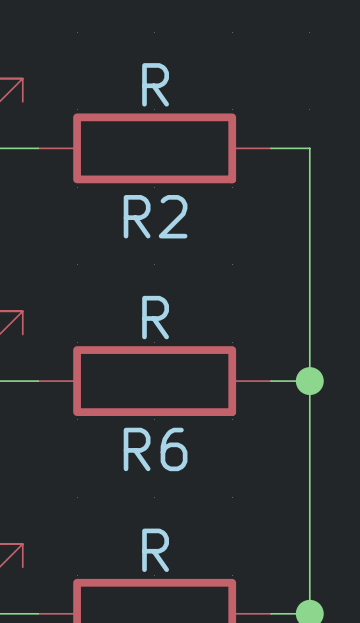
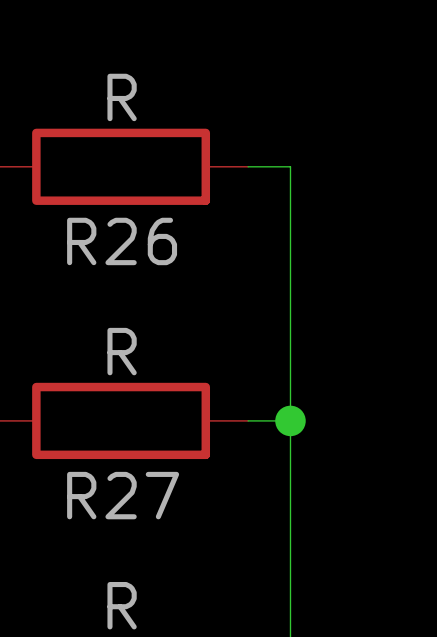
R2 name: R2 (155, 216) -> R26 (122, 241)
R6 name: R6 (155, 449) -> R27 (123, 495)

